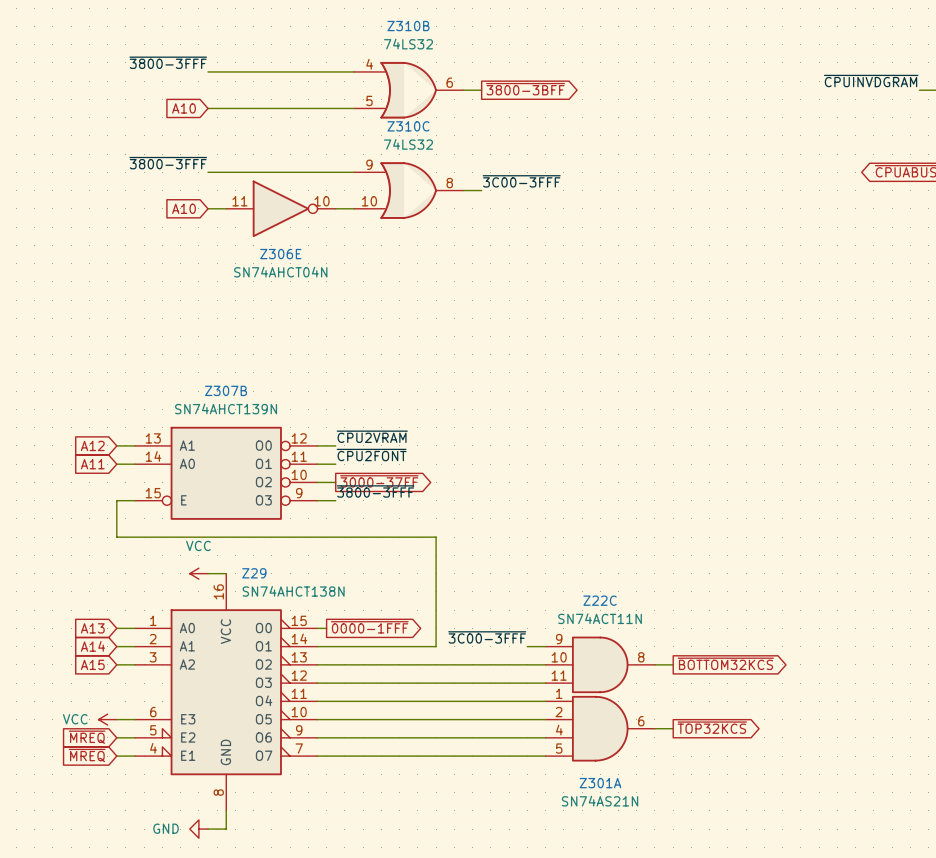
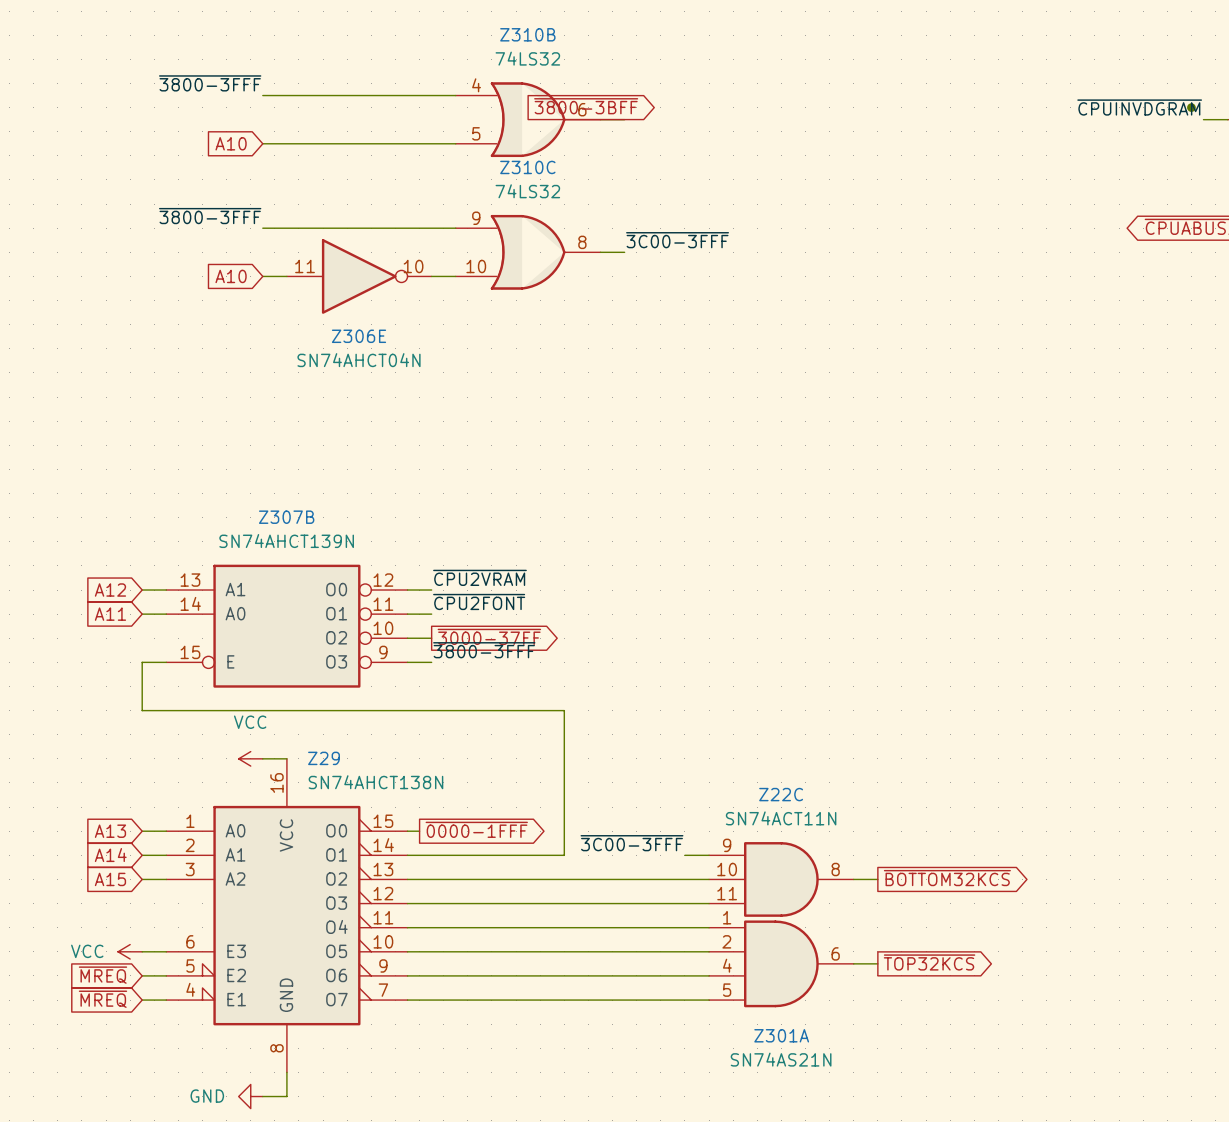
junction: none -> (1191, 107)
global label position: ~{3800-3BFF} (525, 89) -> ~{3800-3BFF} (586, 106)

